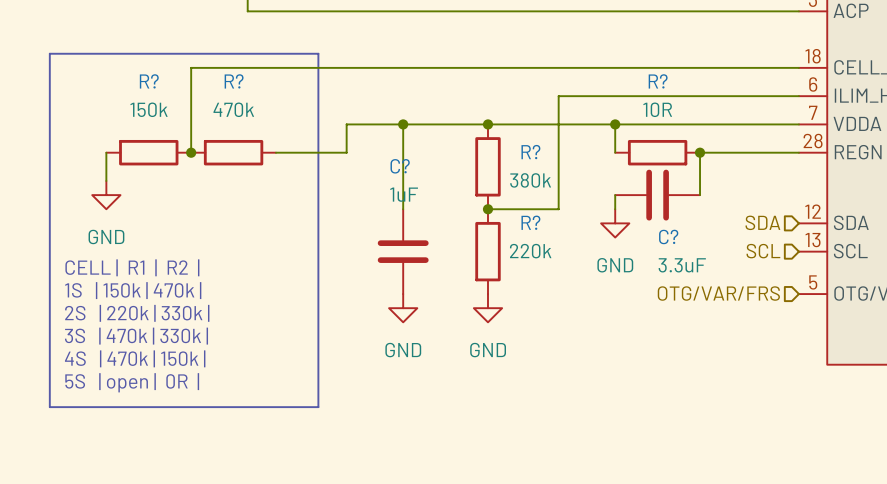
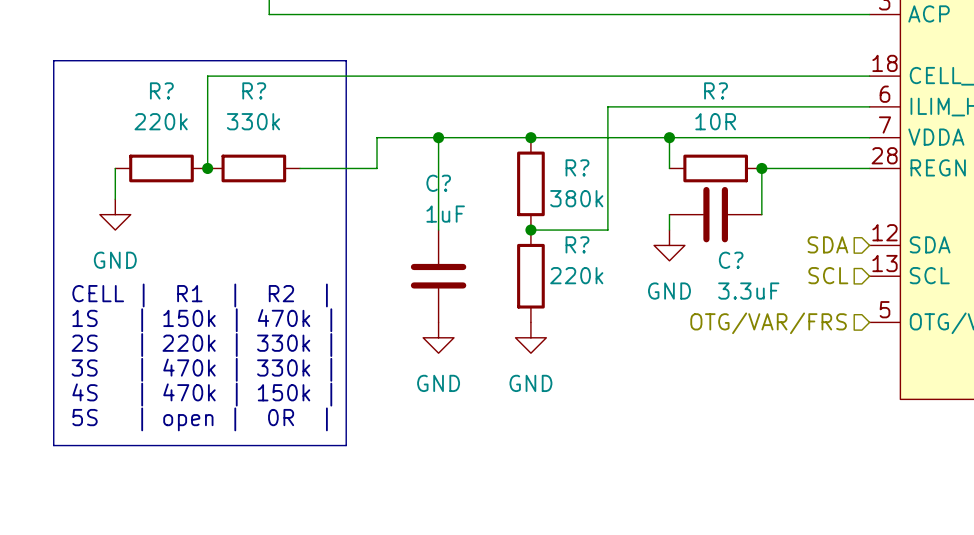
R? value: 150k (149, 109) -> 220k (161, 121)
R? value: 470k (233, 109) -> 330k (253, 121)

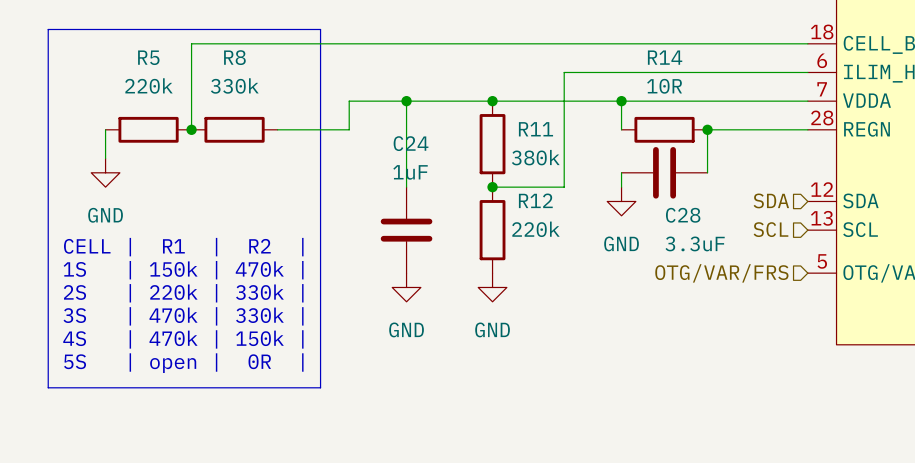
R? name: R? (161, 90) -> R5 (148, 57)
R? name: R? (254, 90) -> R8 (234, 57)
R? name: R? (716, 90) -> R14 (665, 57)
R? name: R? (577, 167) -> R11 (535, 129)
C? name: C? (438, 183) -> C24 (411, 143)
R? name: R? (577, 244) -> R12 (535, 200)
C? name: C? (731, 260) -> C28 (683, 215)

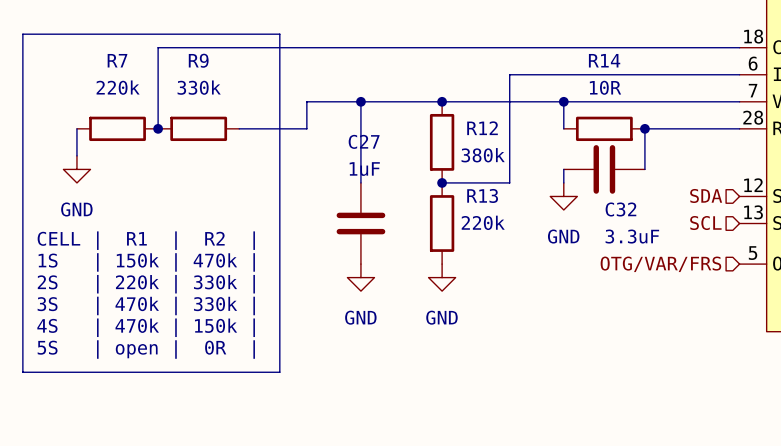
R5 name: R5 (148, 57) -> R7 (117, 60)
R8 name: R8 (234, 57) -> R9 (198, 60)
R11 name: R11 (535, 129) -> R12 (482, 128)
C24 name: C24 (411, 143) -> C27 (364, 141)
R12 name: R12 (535, 200) -> R13 (482, 195)
C28 name: C28 (683, 215) -> C32 (620, 209)

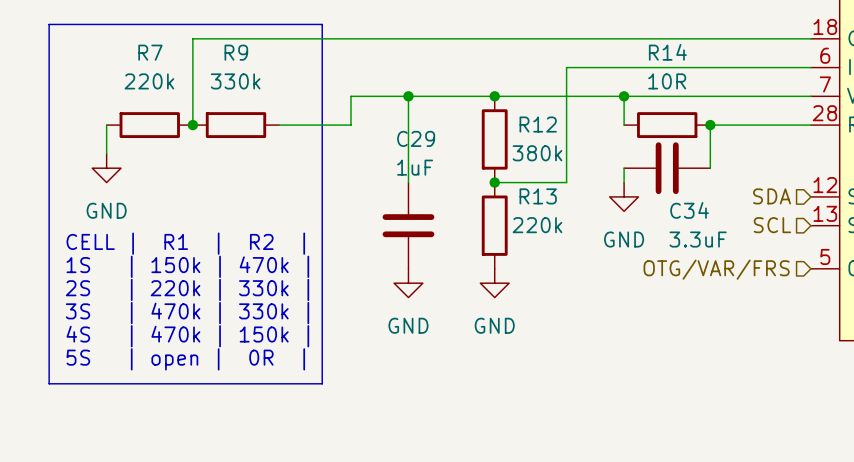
C27 name: C27 (364, 141) -> C29 (416, 138)
C32 name: C32 (620, 209) -> C34 (689, 210)

